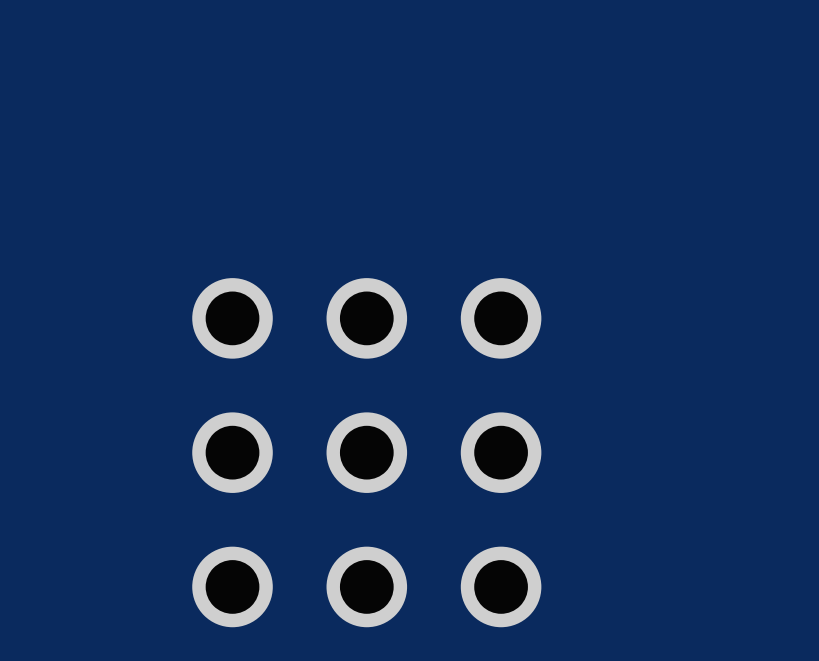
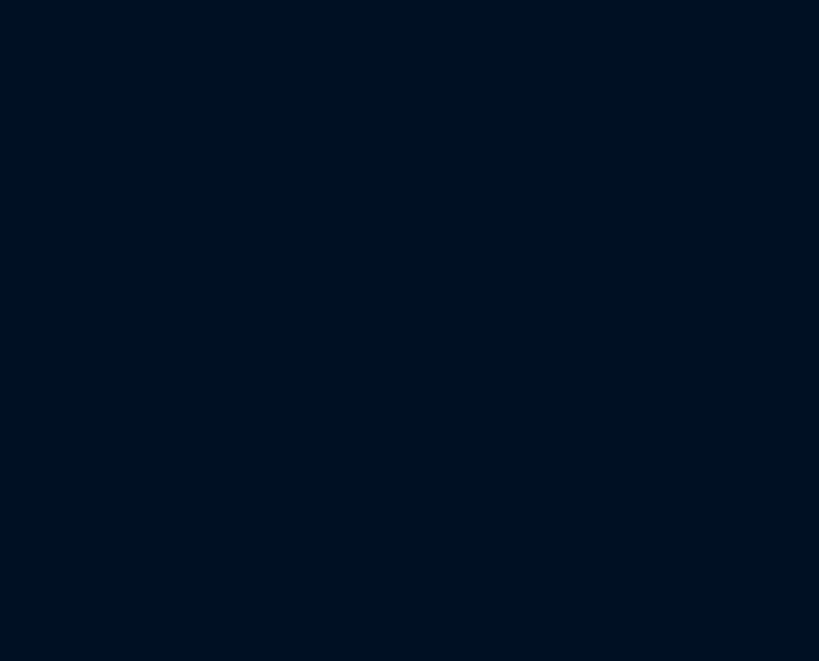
part: (232, 318) -> none
part: (366, 318) -> none
part: (501, 318) -> none
part: (232, 452) -> none
part: (366, 452) -> none
part: (501, 452) -> none
part: (232, 586) -> none
part: (366, 586) -> none
part: (501, 586) -> none

